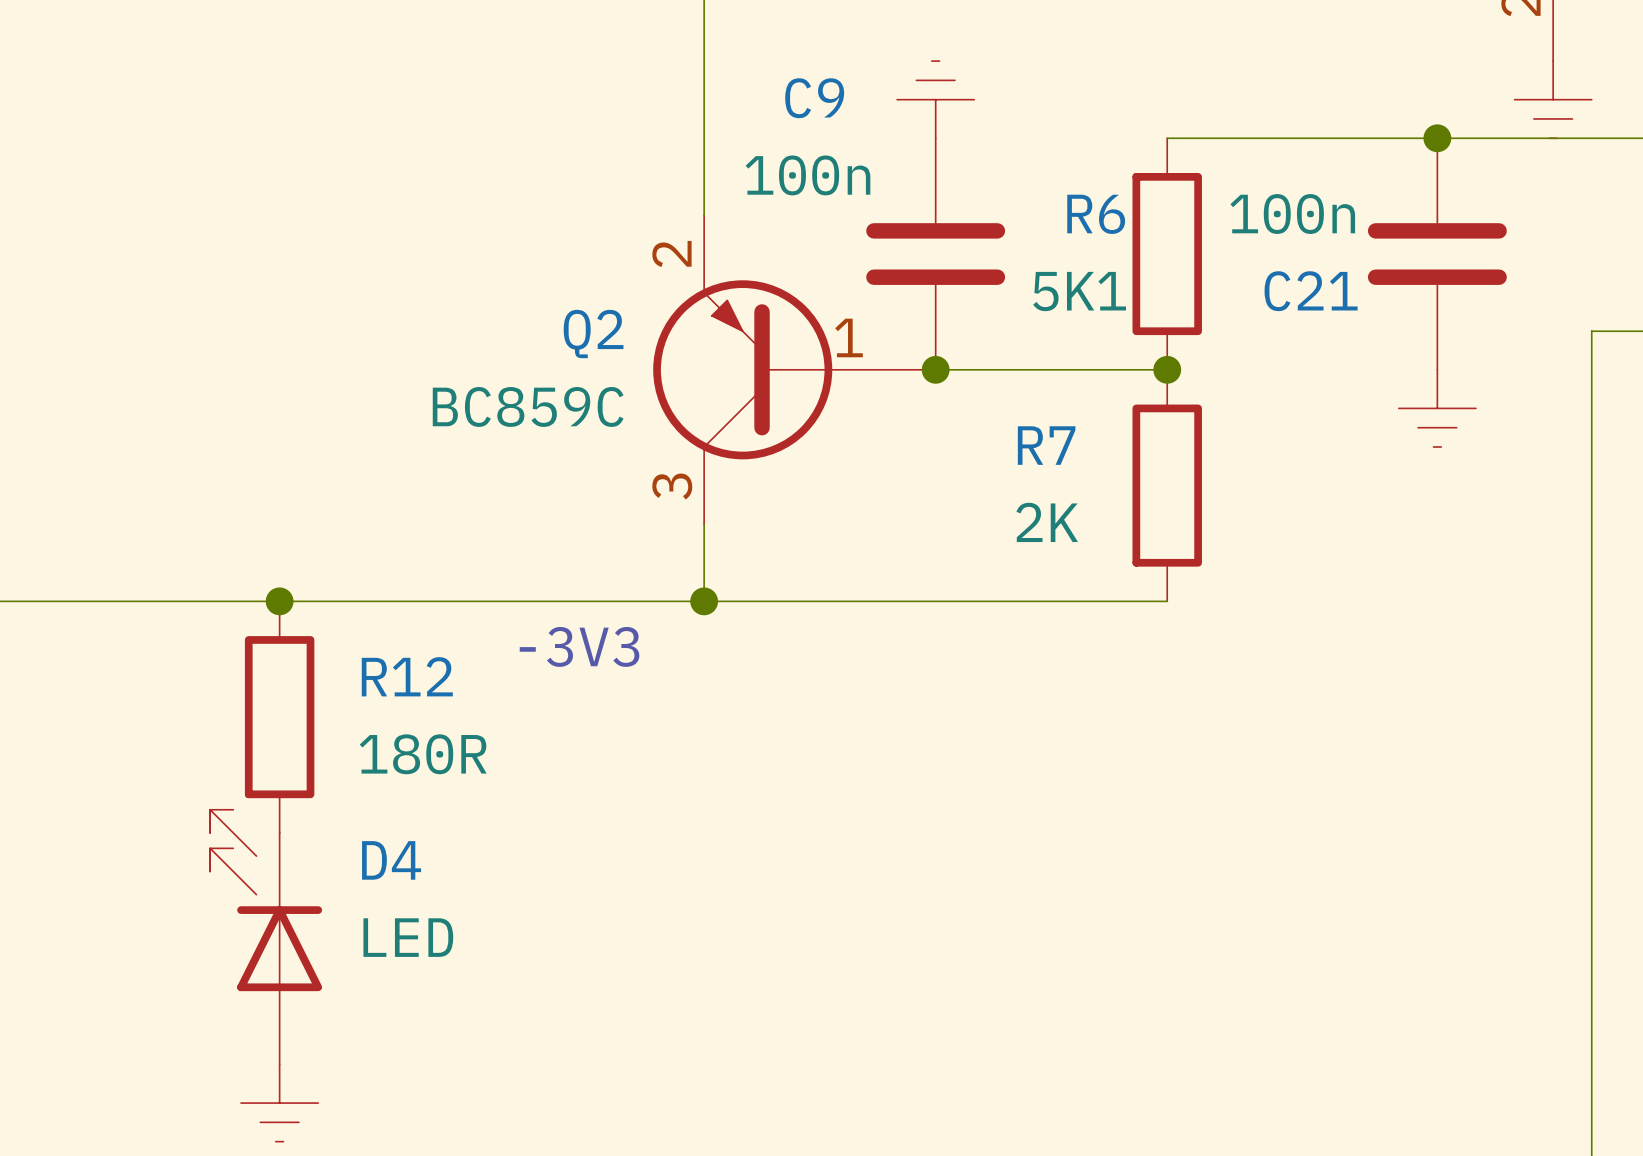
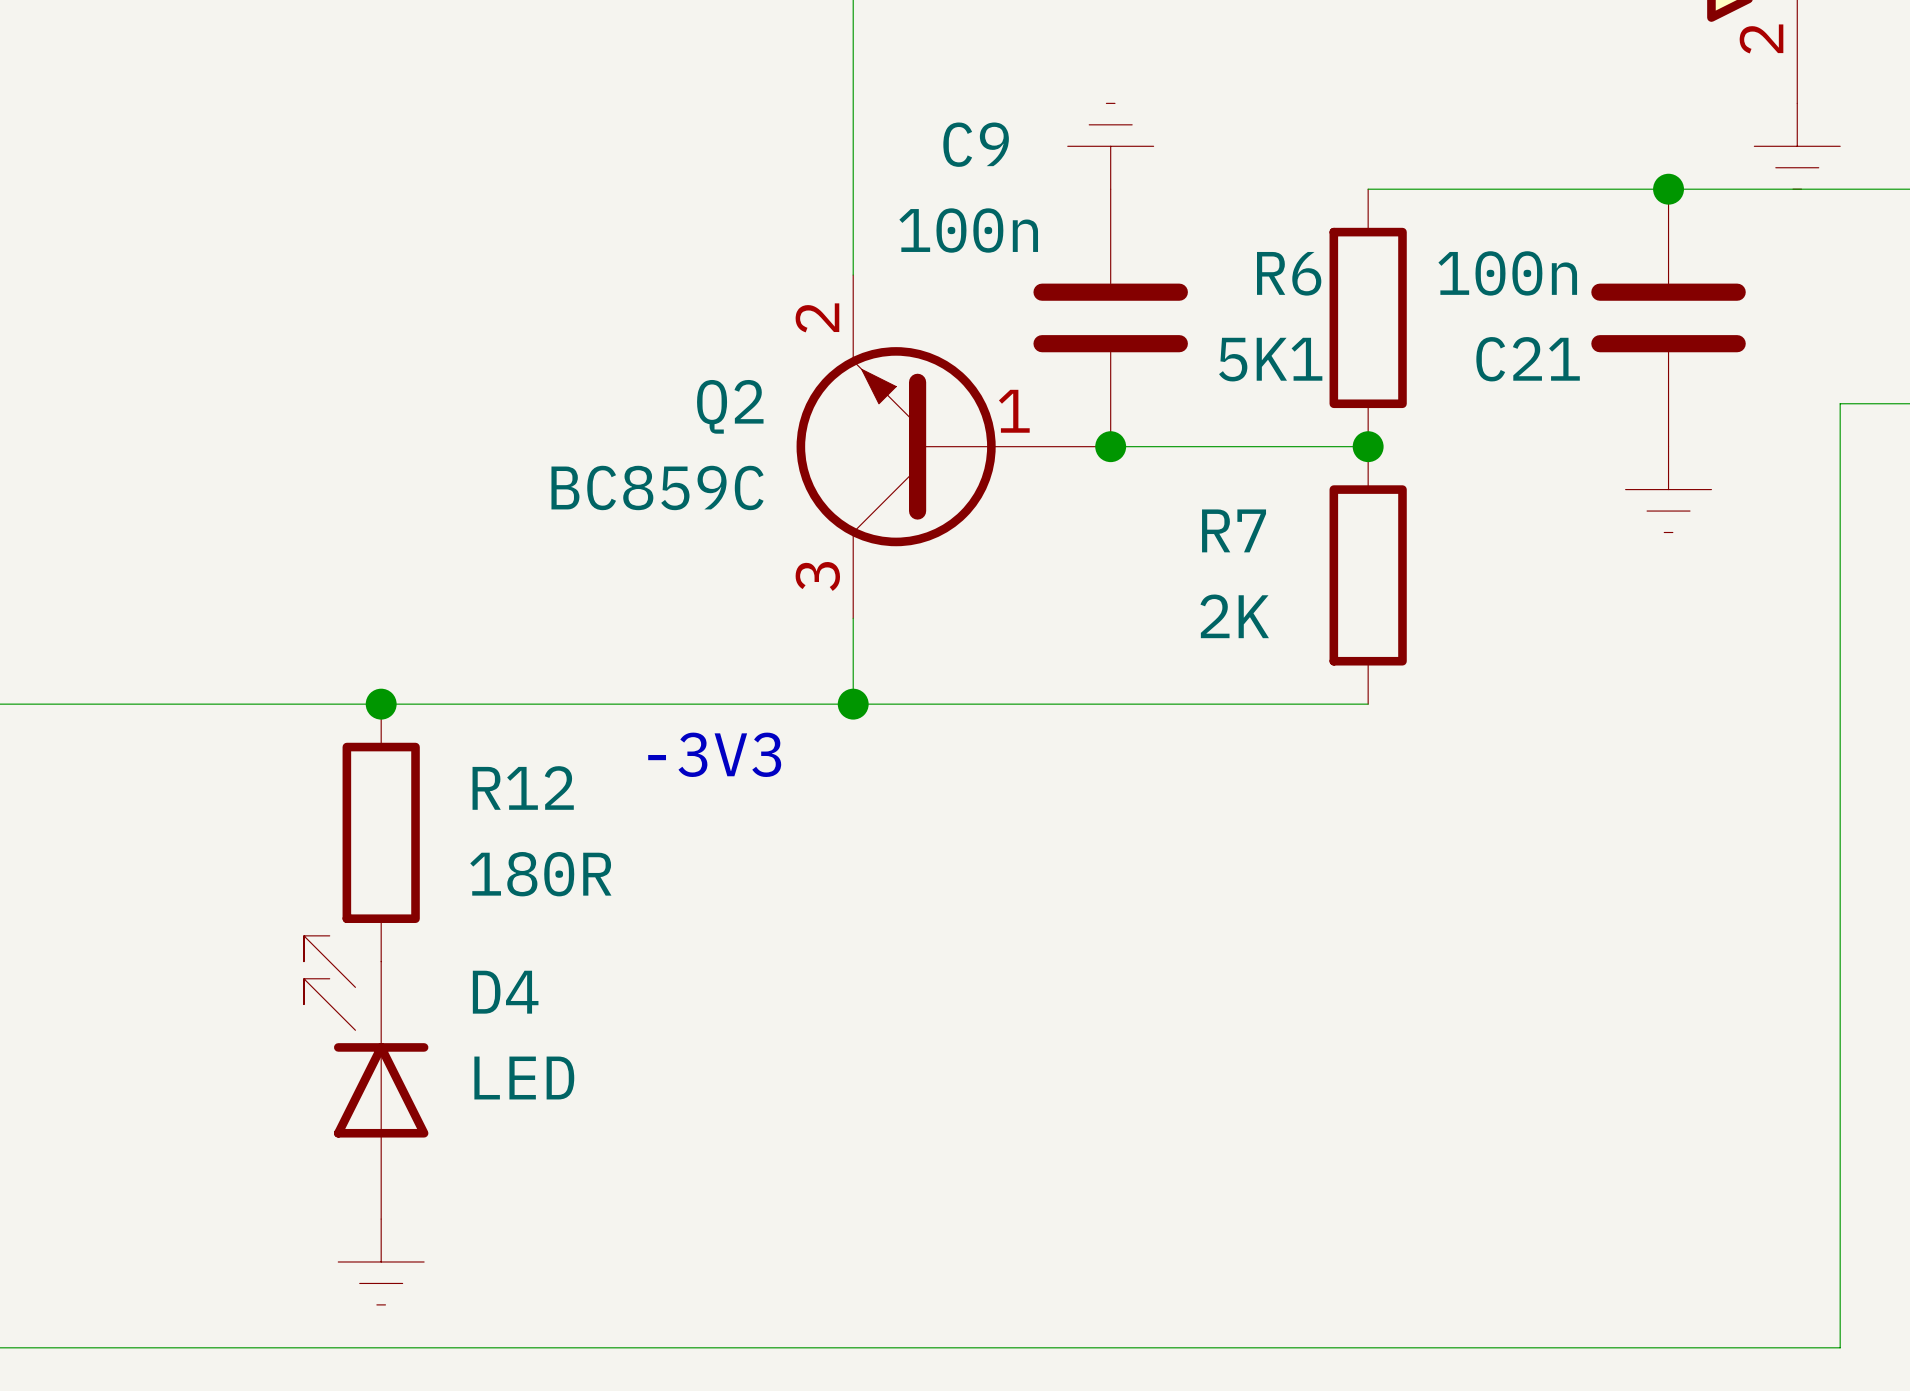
Q2 symbol: [653, 215, 936, 525] -> [796, 275, 1111, 619]

